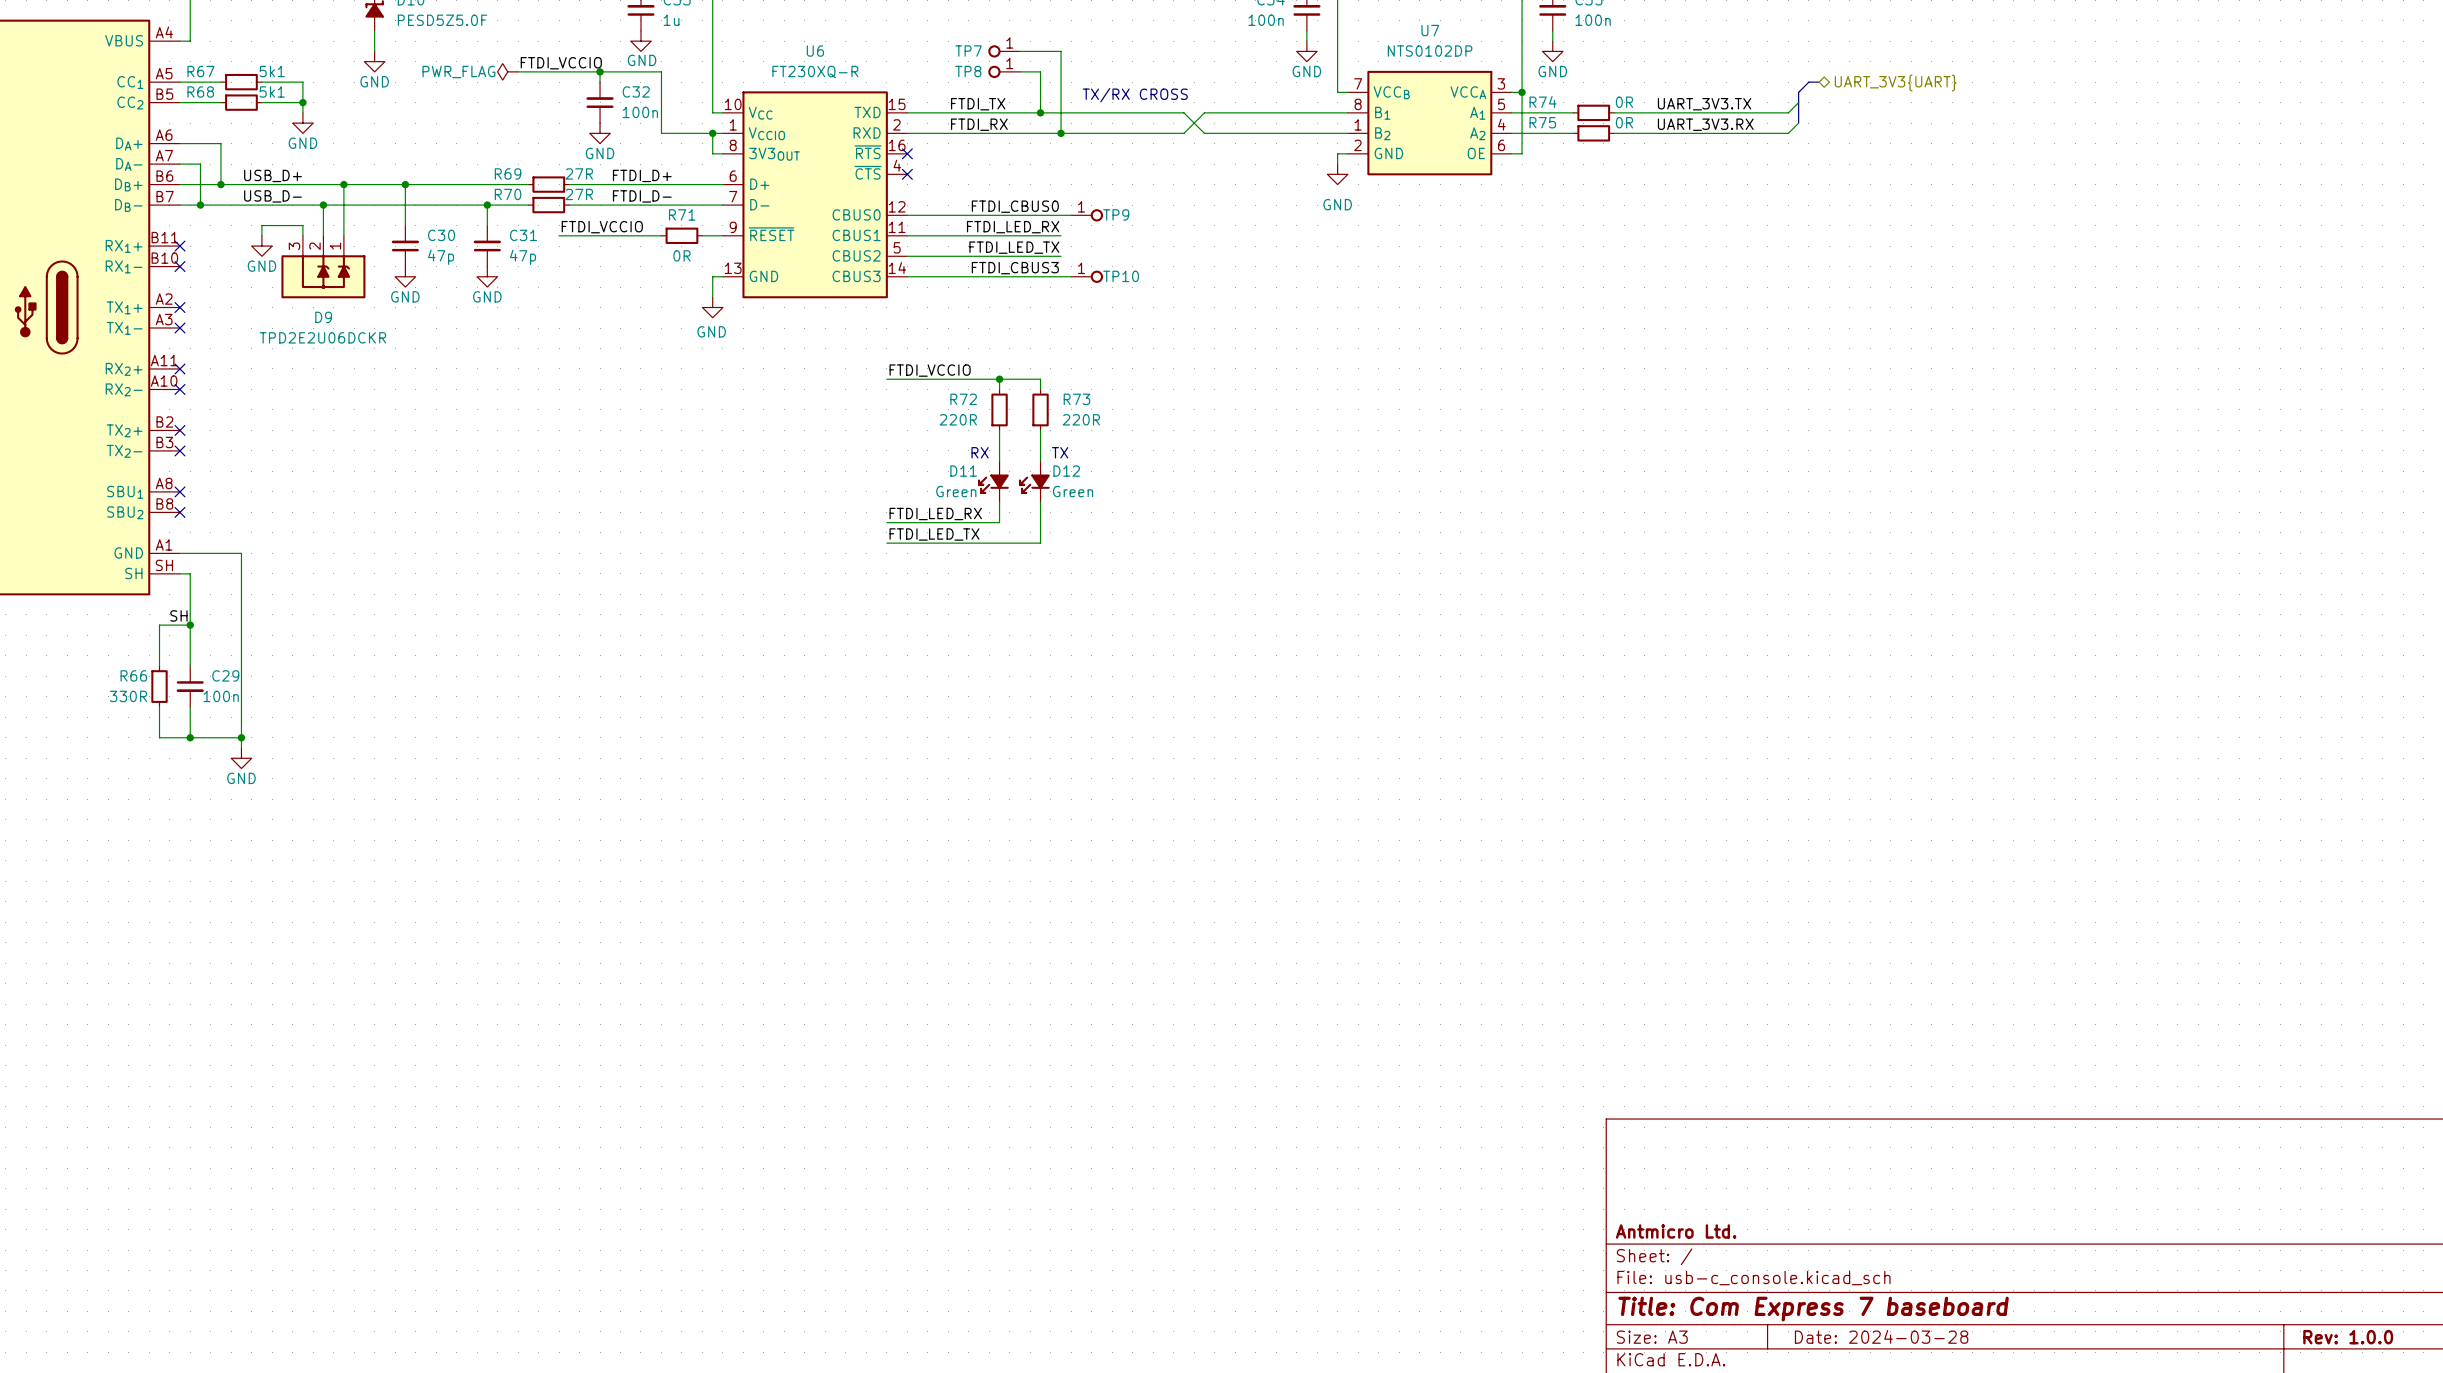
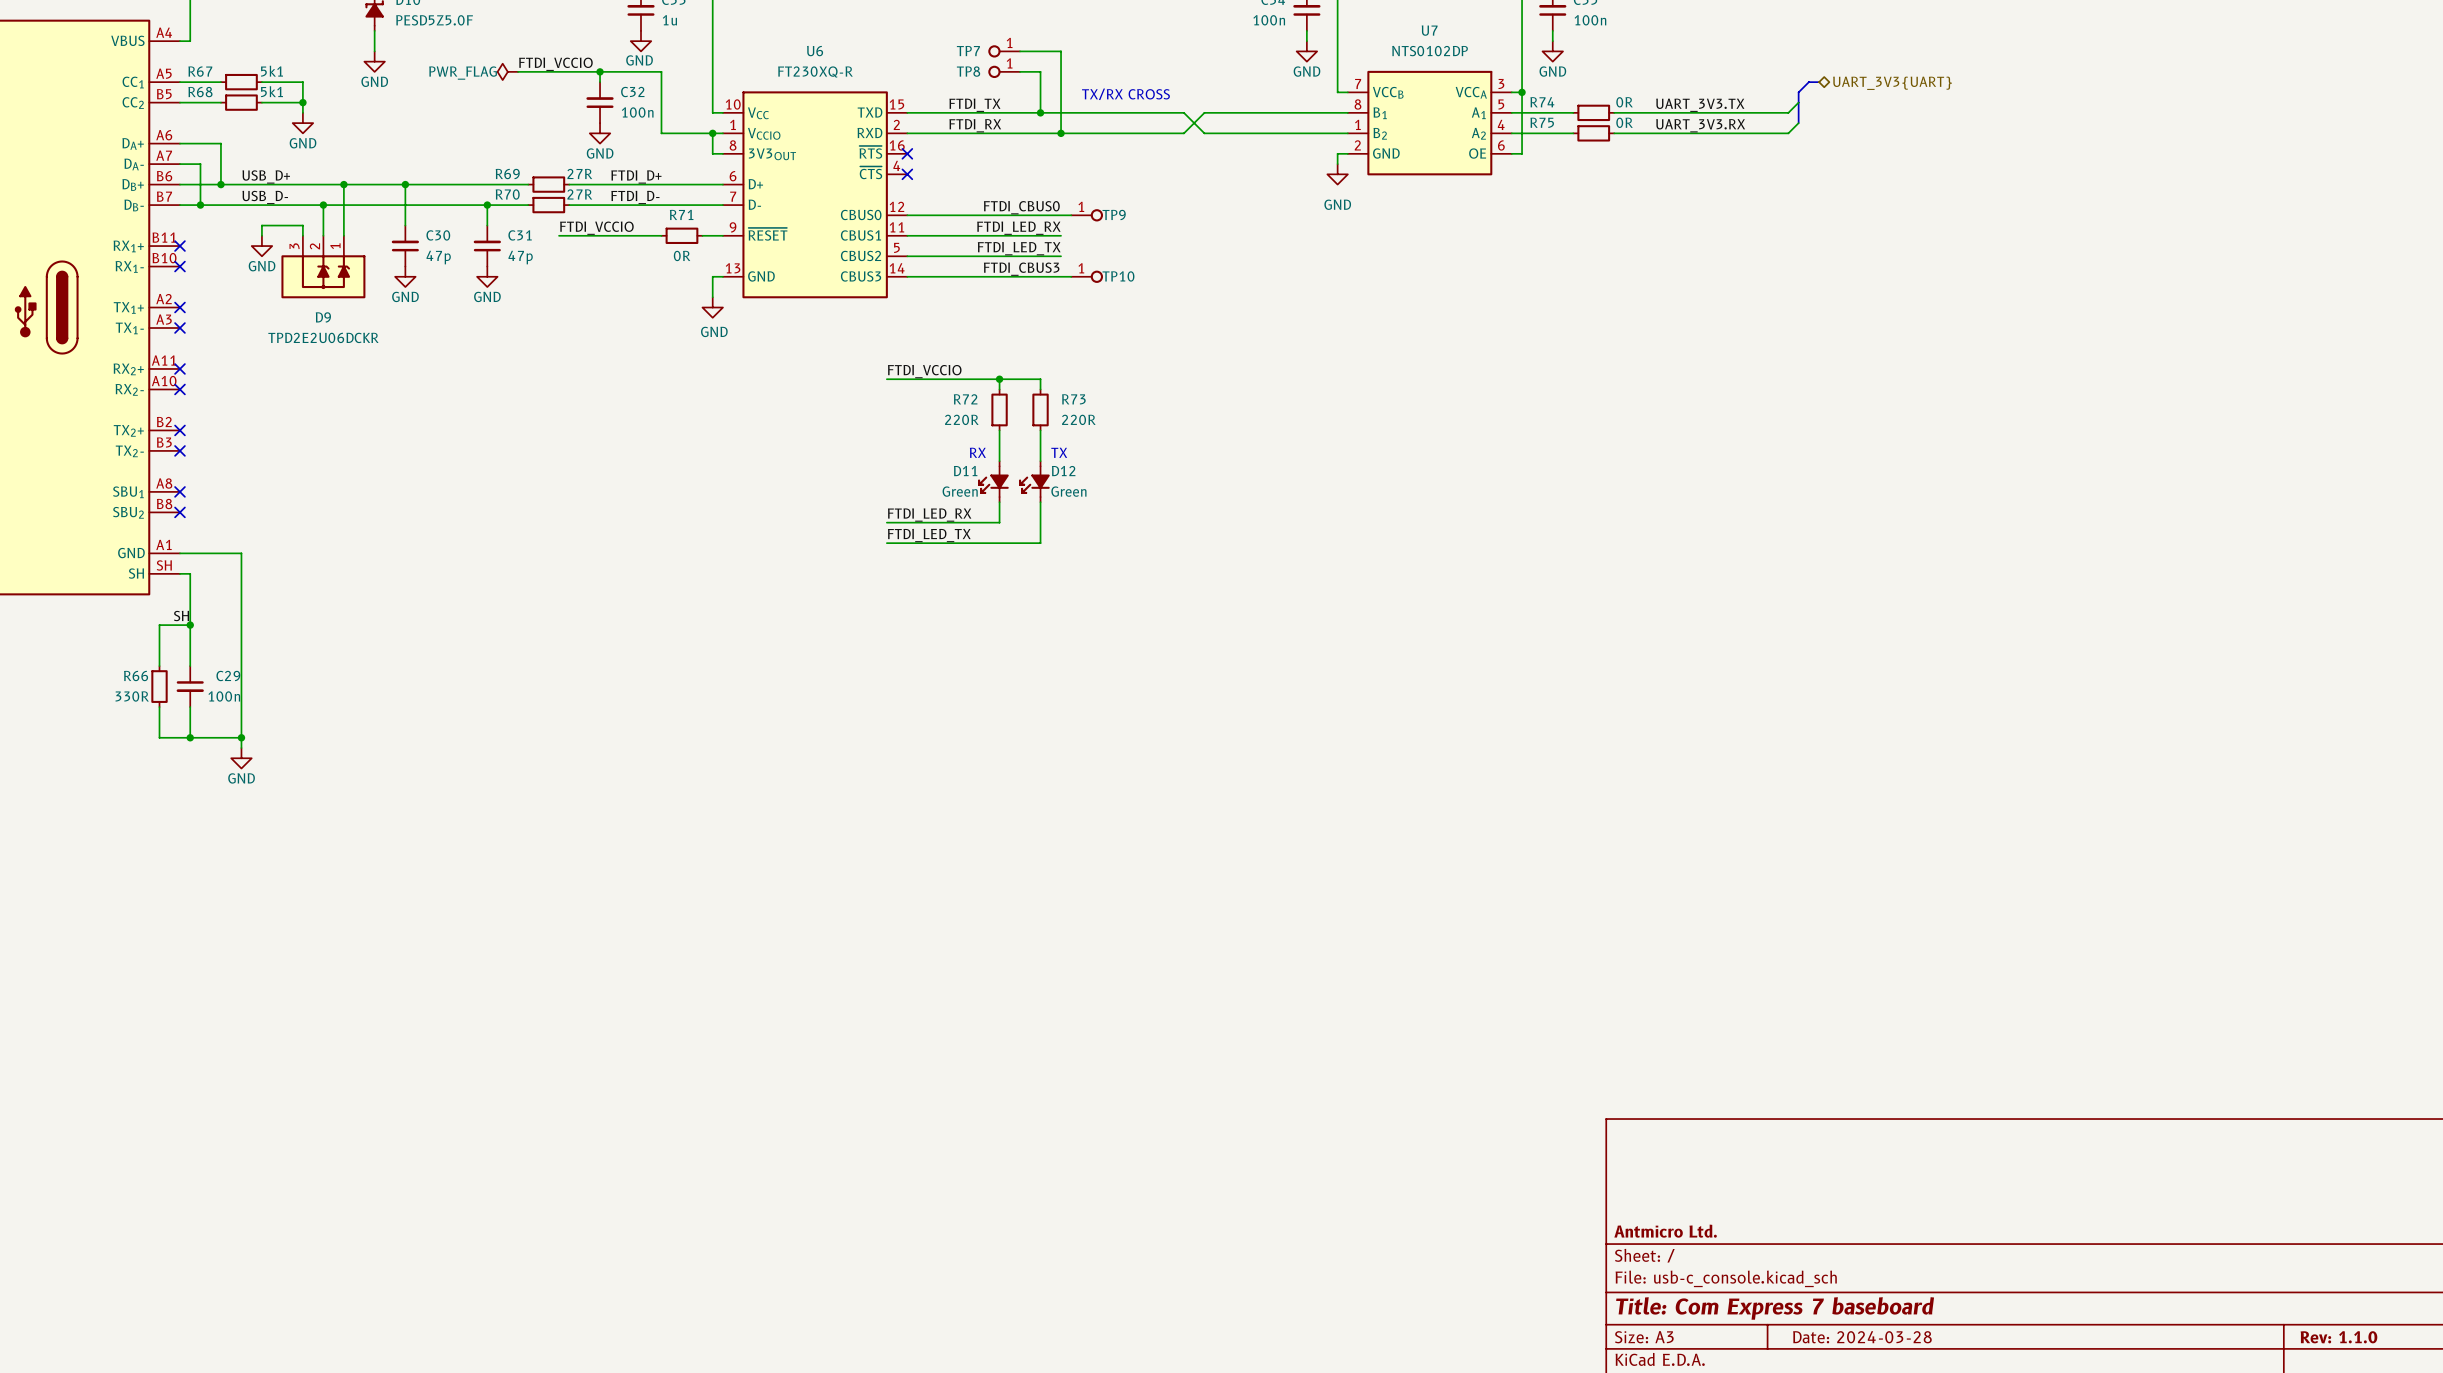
title block: Rev: 1.0.0 (2348, 1337) -> Rev: 1.1.0 (2338, 1337)

